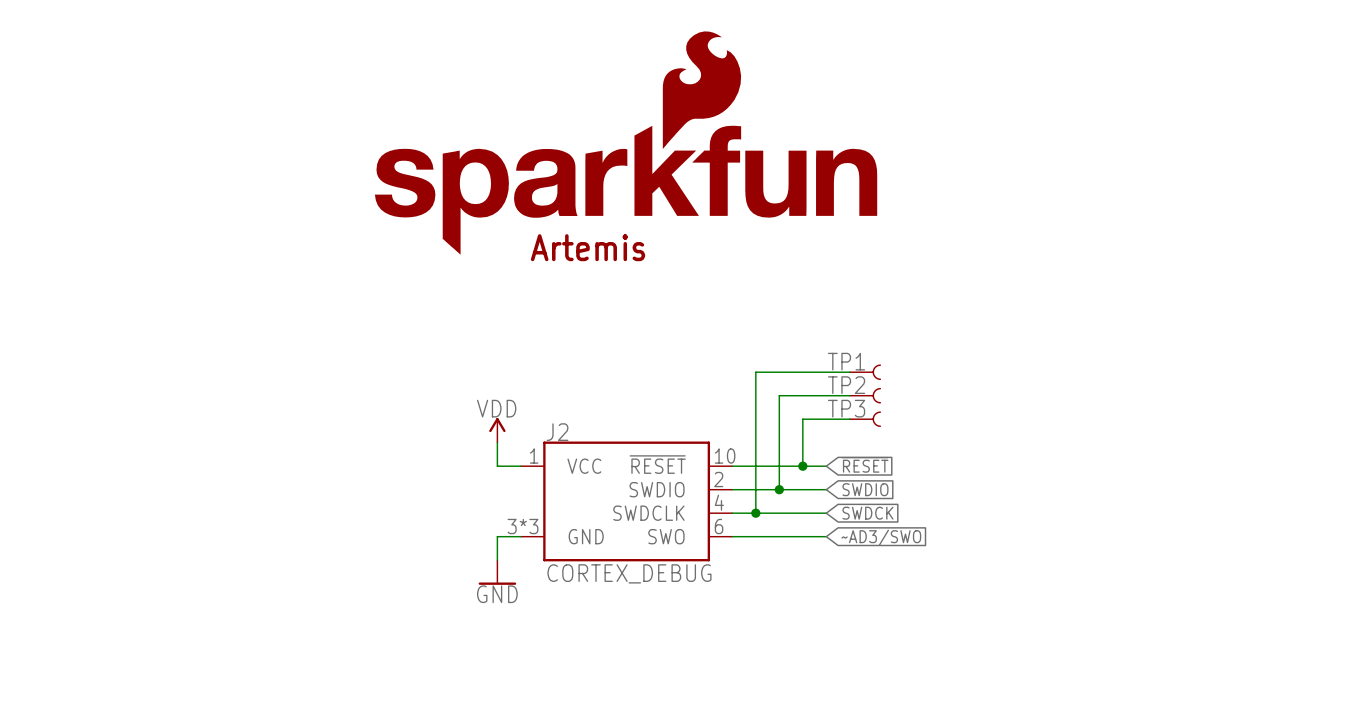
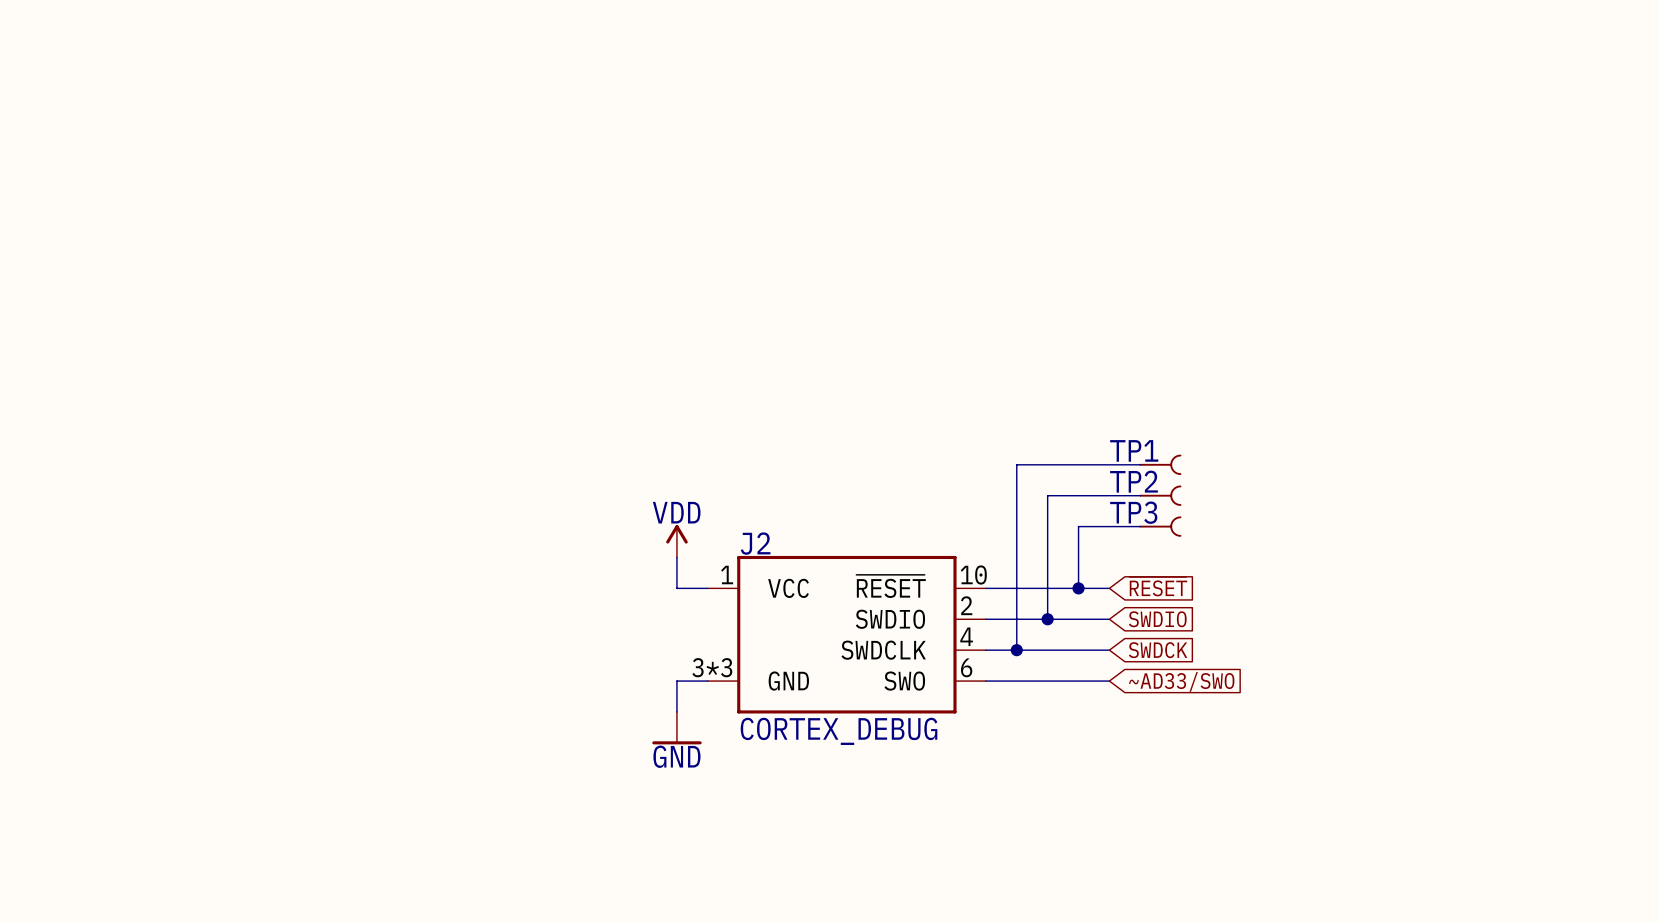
part: (701, 90) -> none
part: (626, 190) -> none
text: Artemis (588, 247) -> none
global label: ~AD3/SWO (881, 537) -> ~AD33/SWO (1181, 681)

